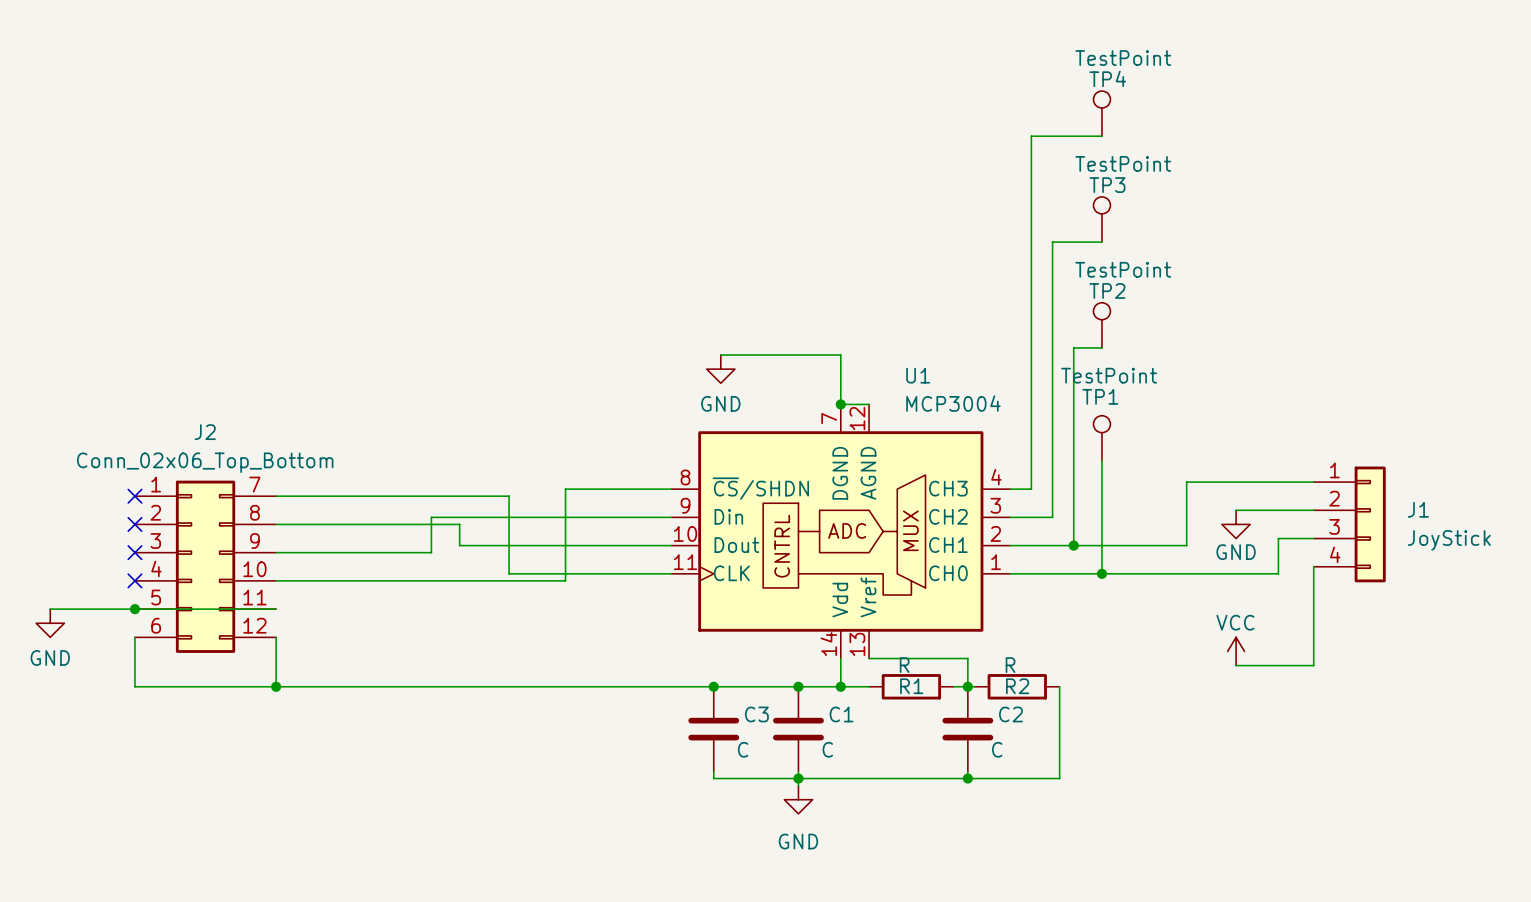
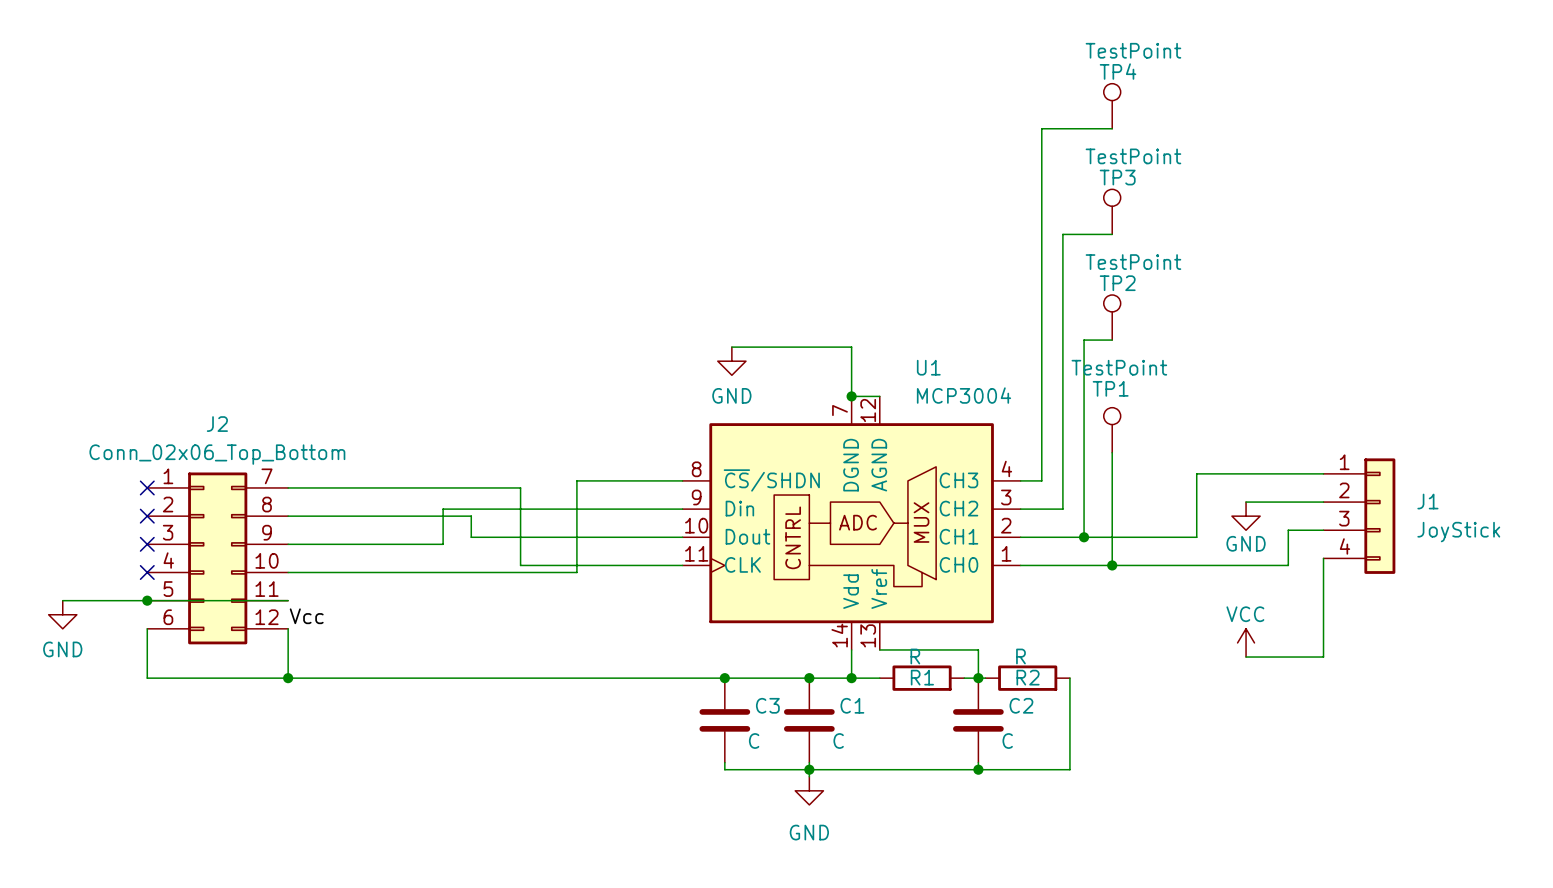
label: none -> Vcc (306, 616)

